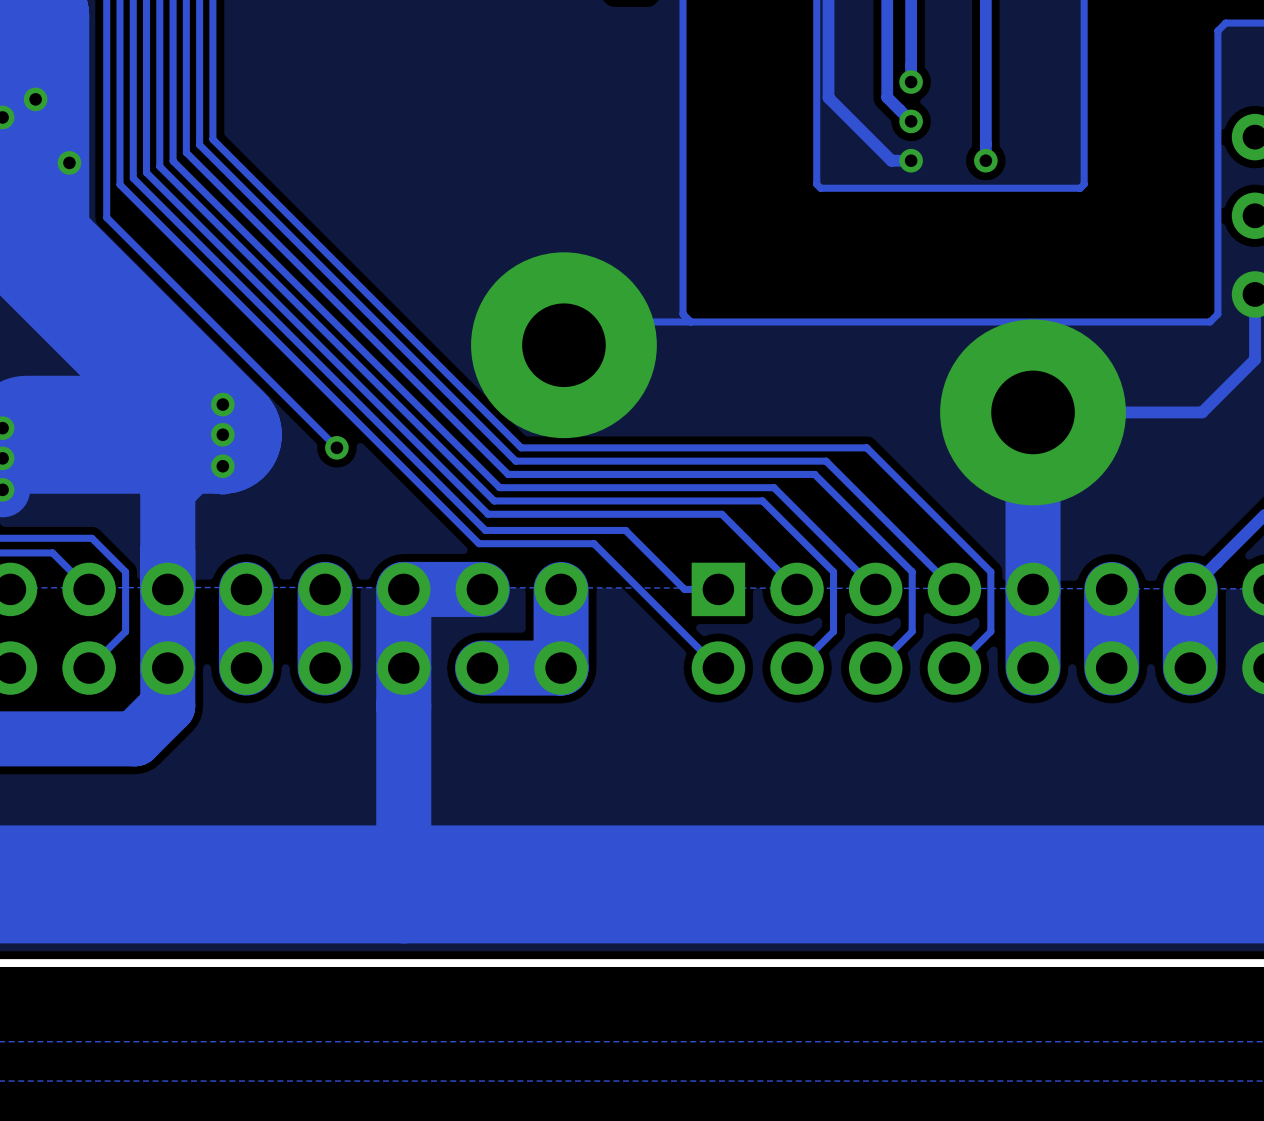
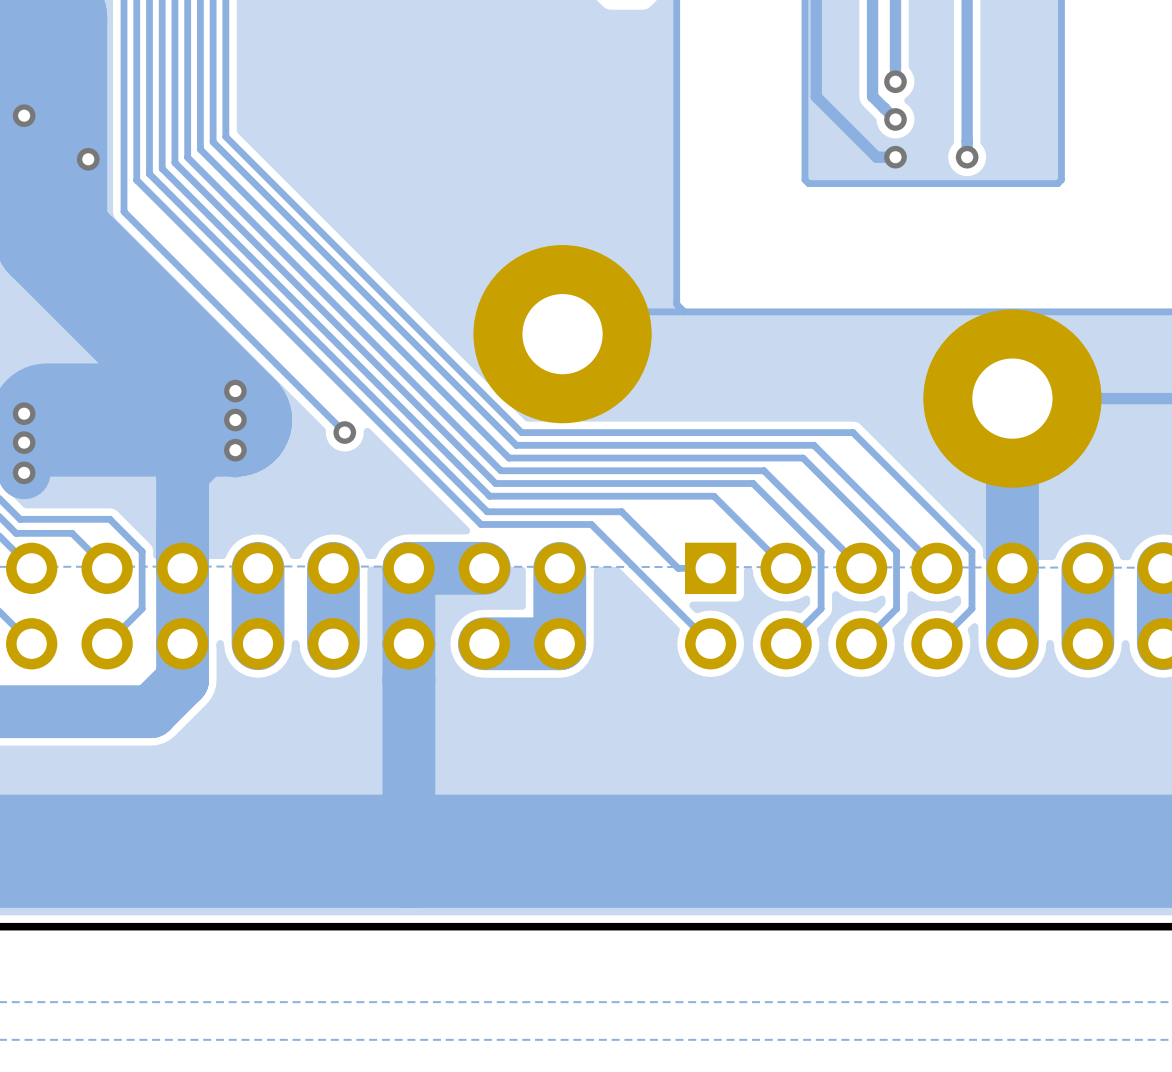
via: (35, 99) -> none

